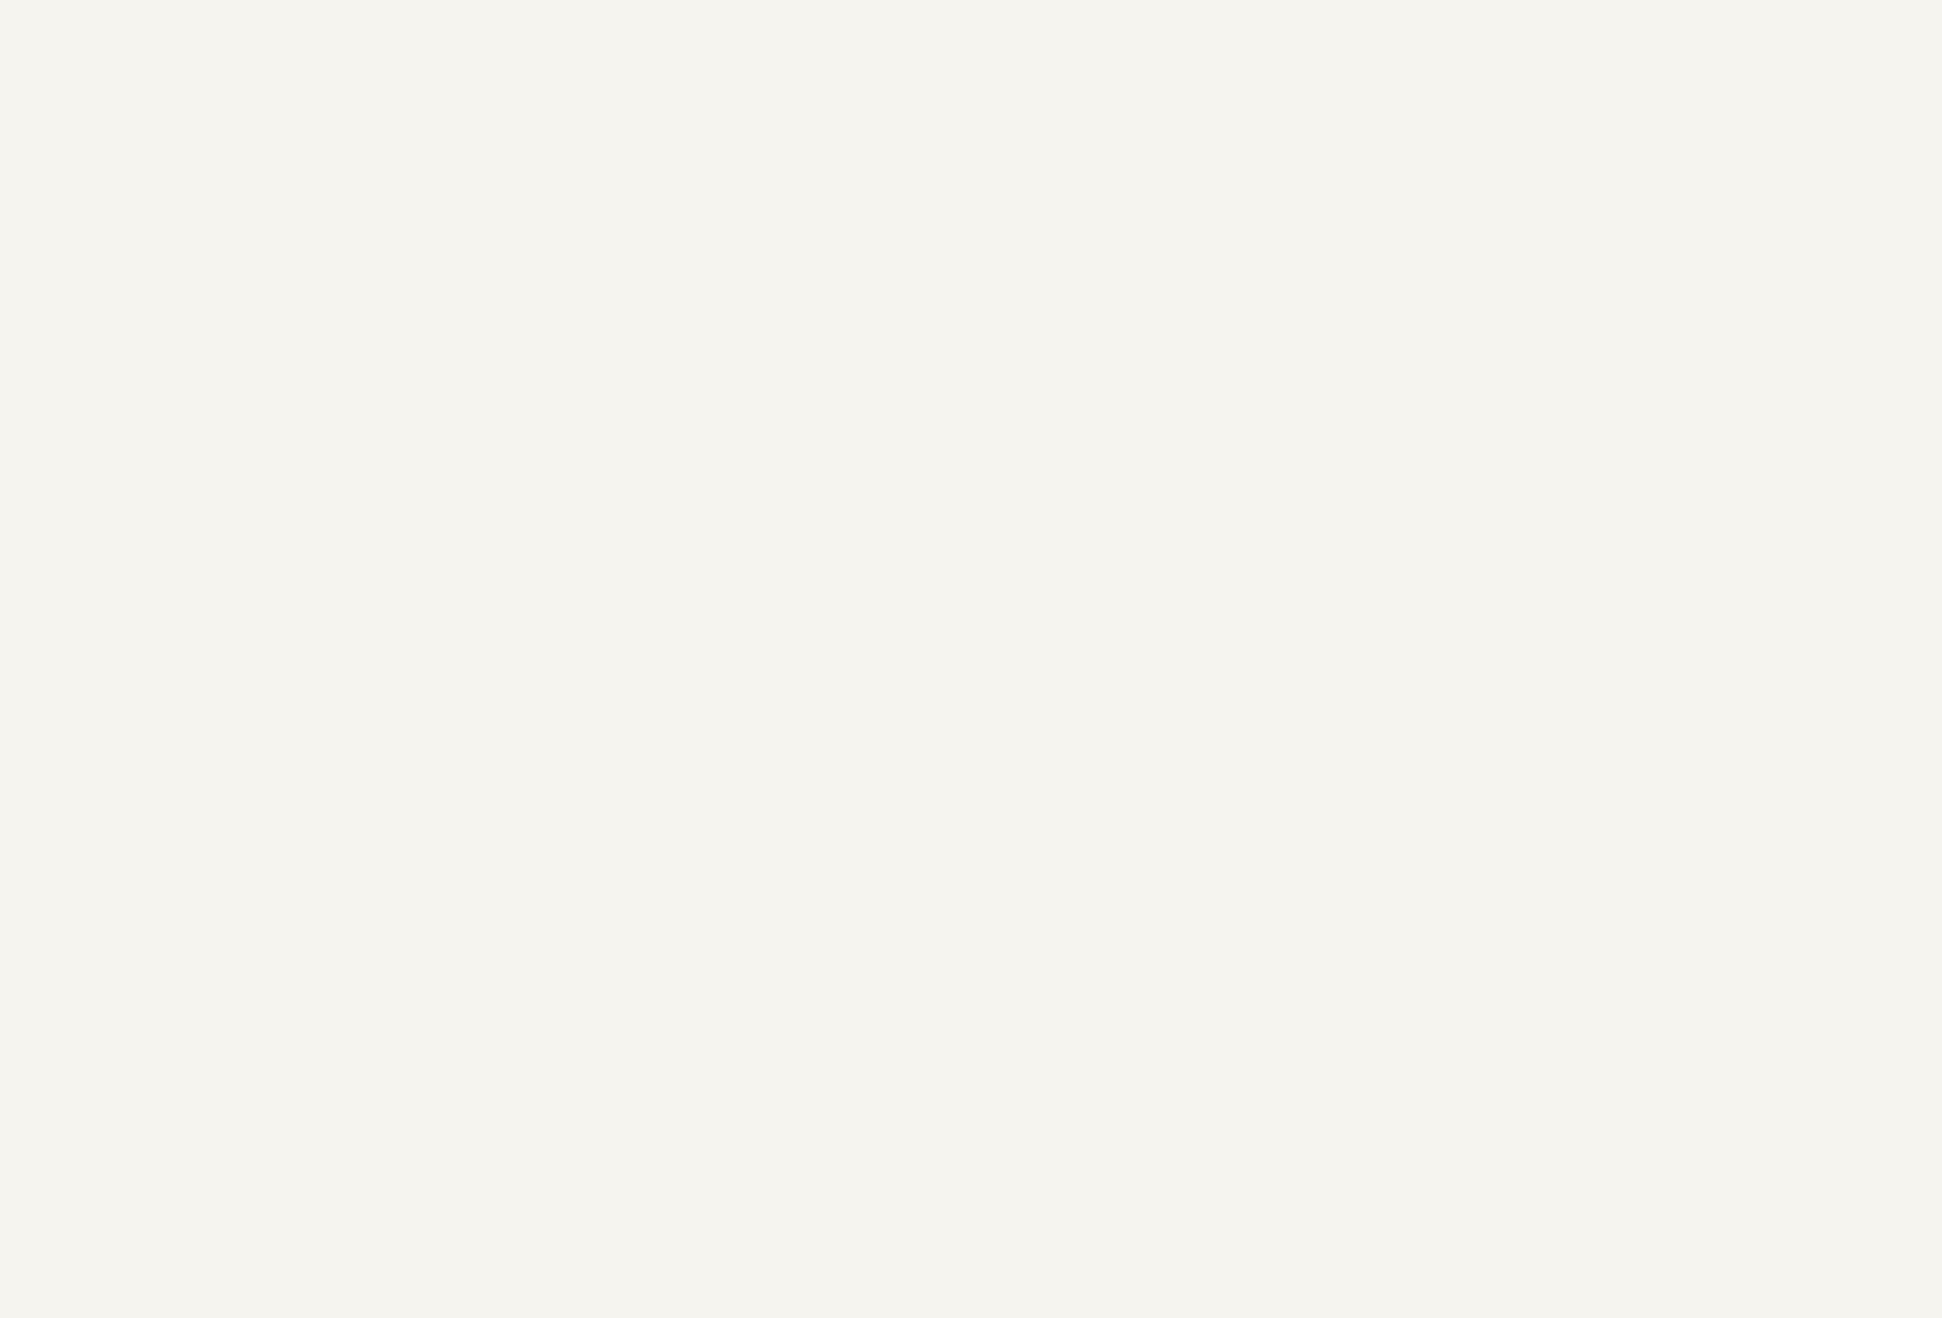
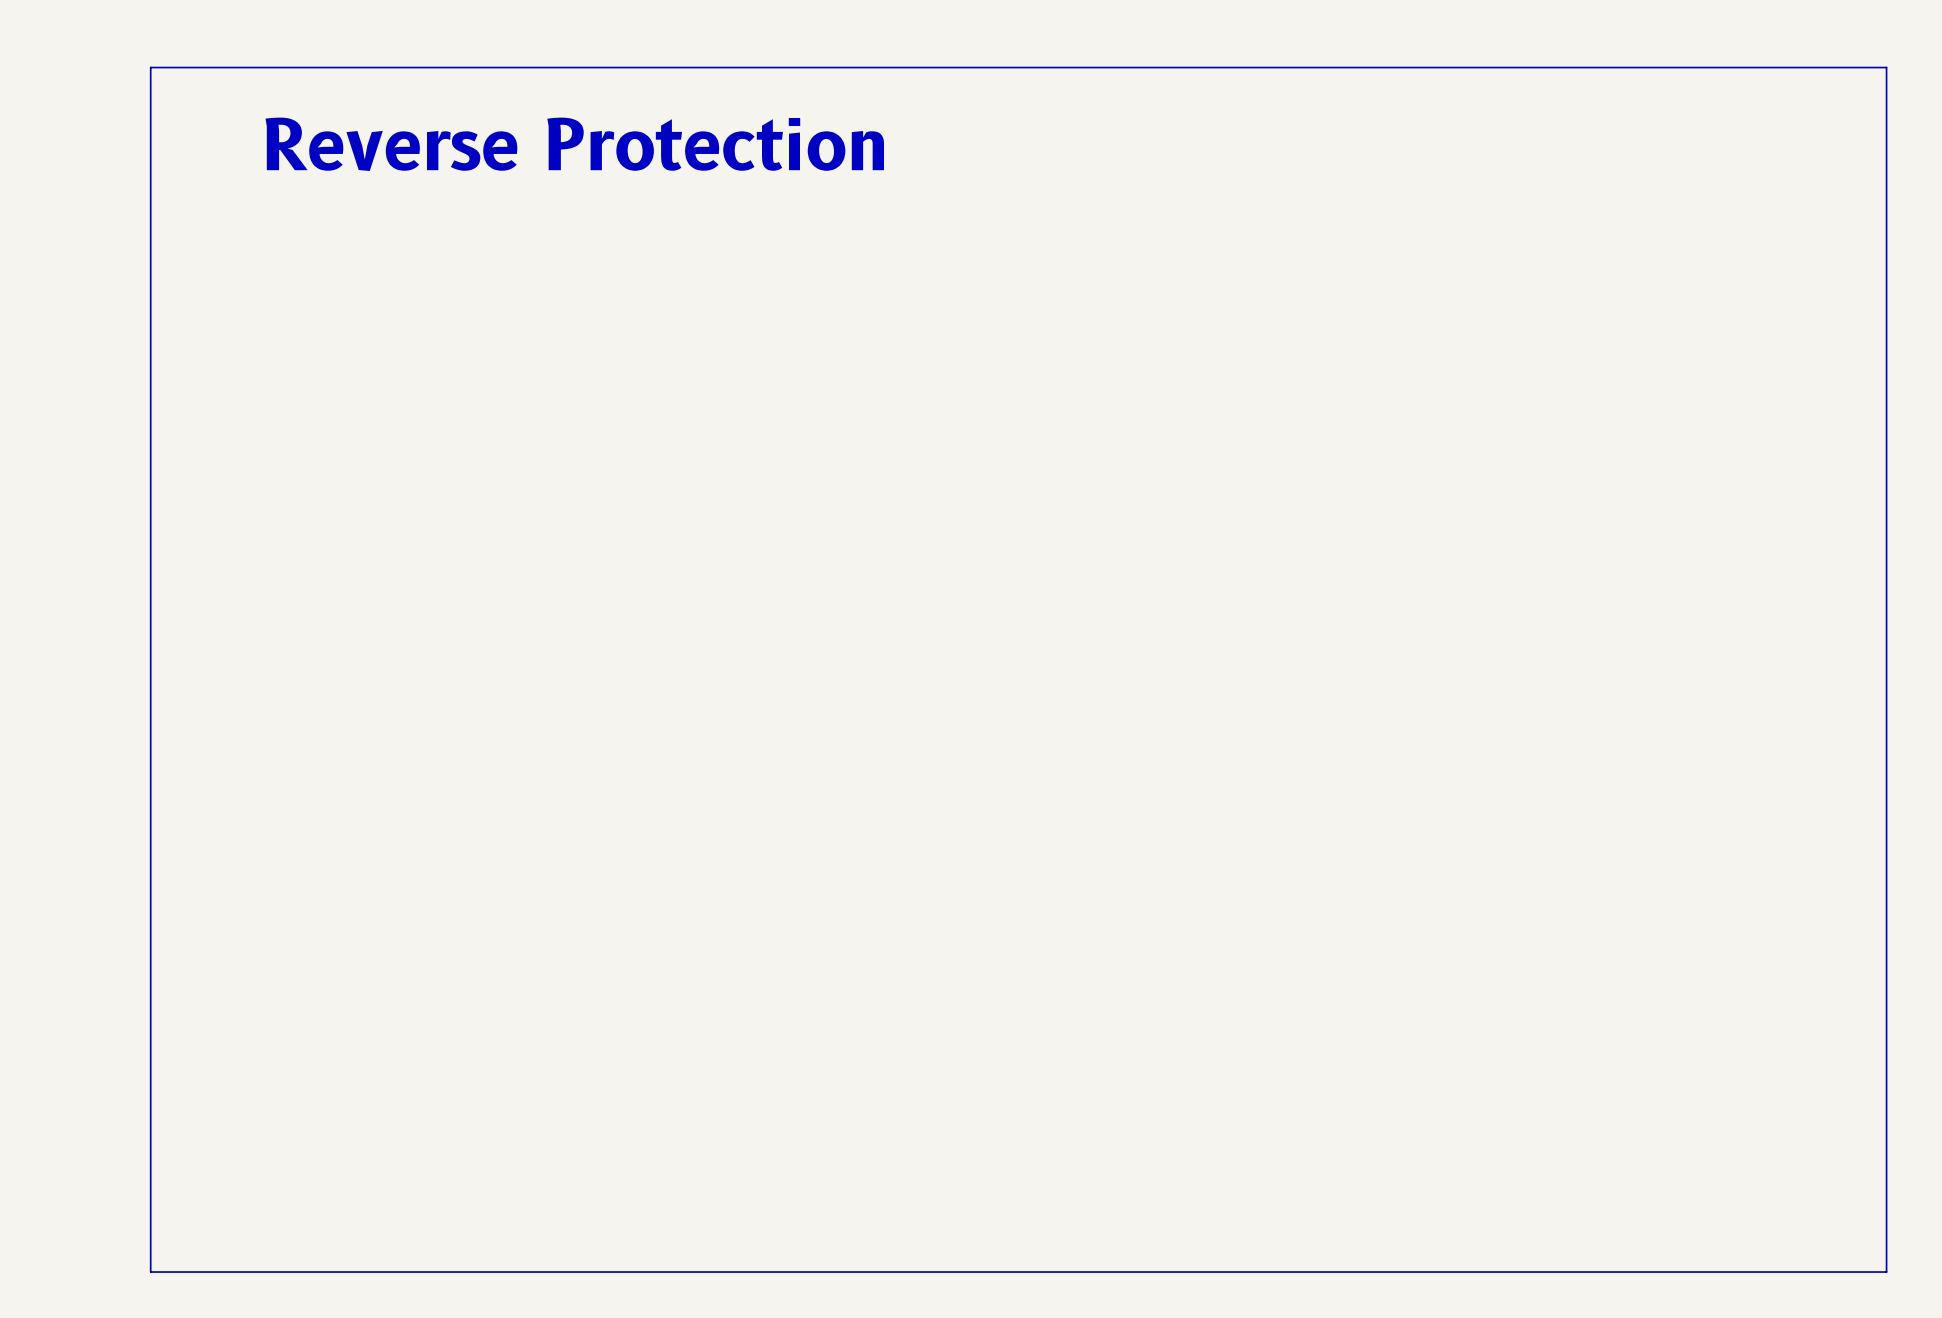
line: none -> (150, 67) (1886, 67) (1886, 1272) (150, 1272) (150, 67)
text: none -> Reverse Protection (574, 144)

